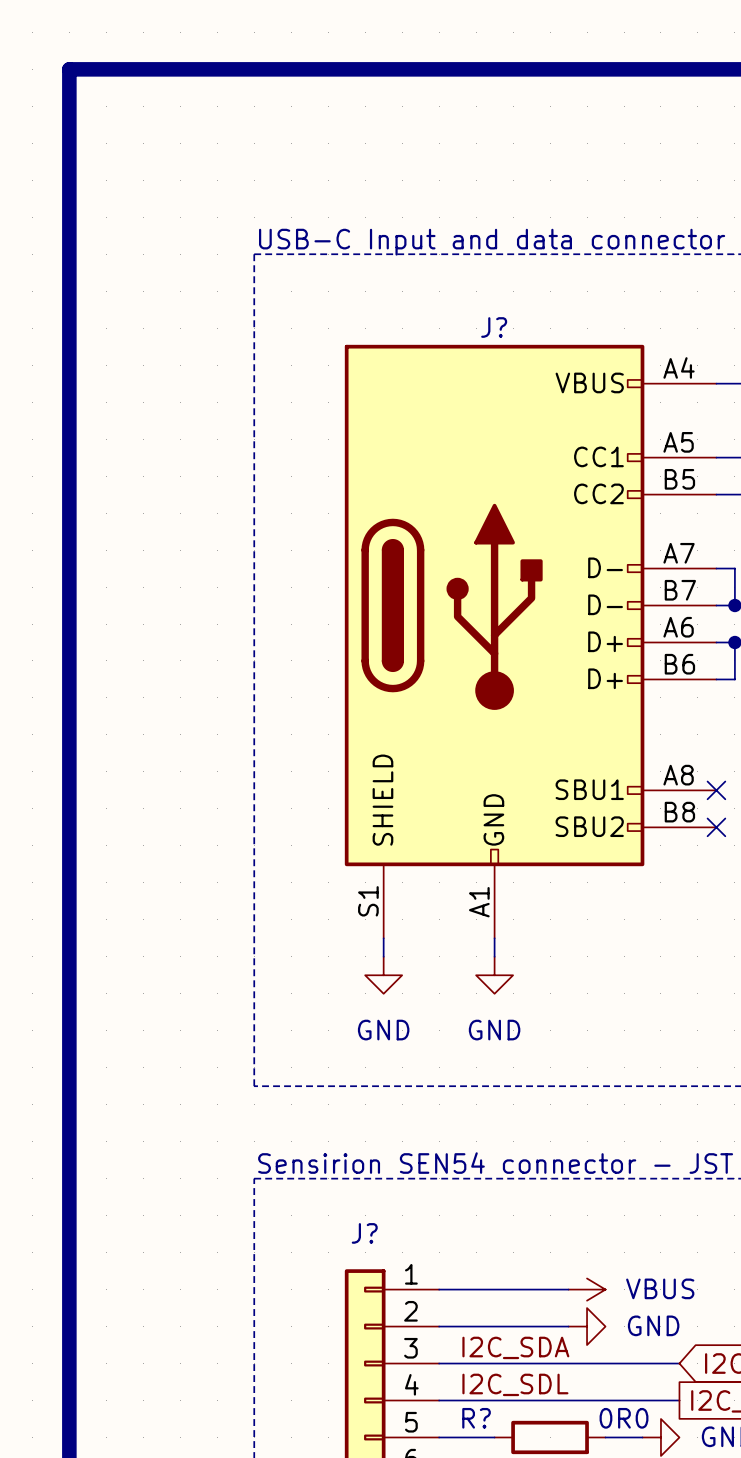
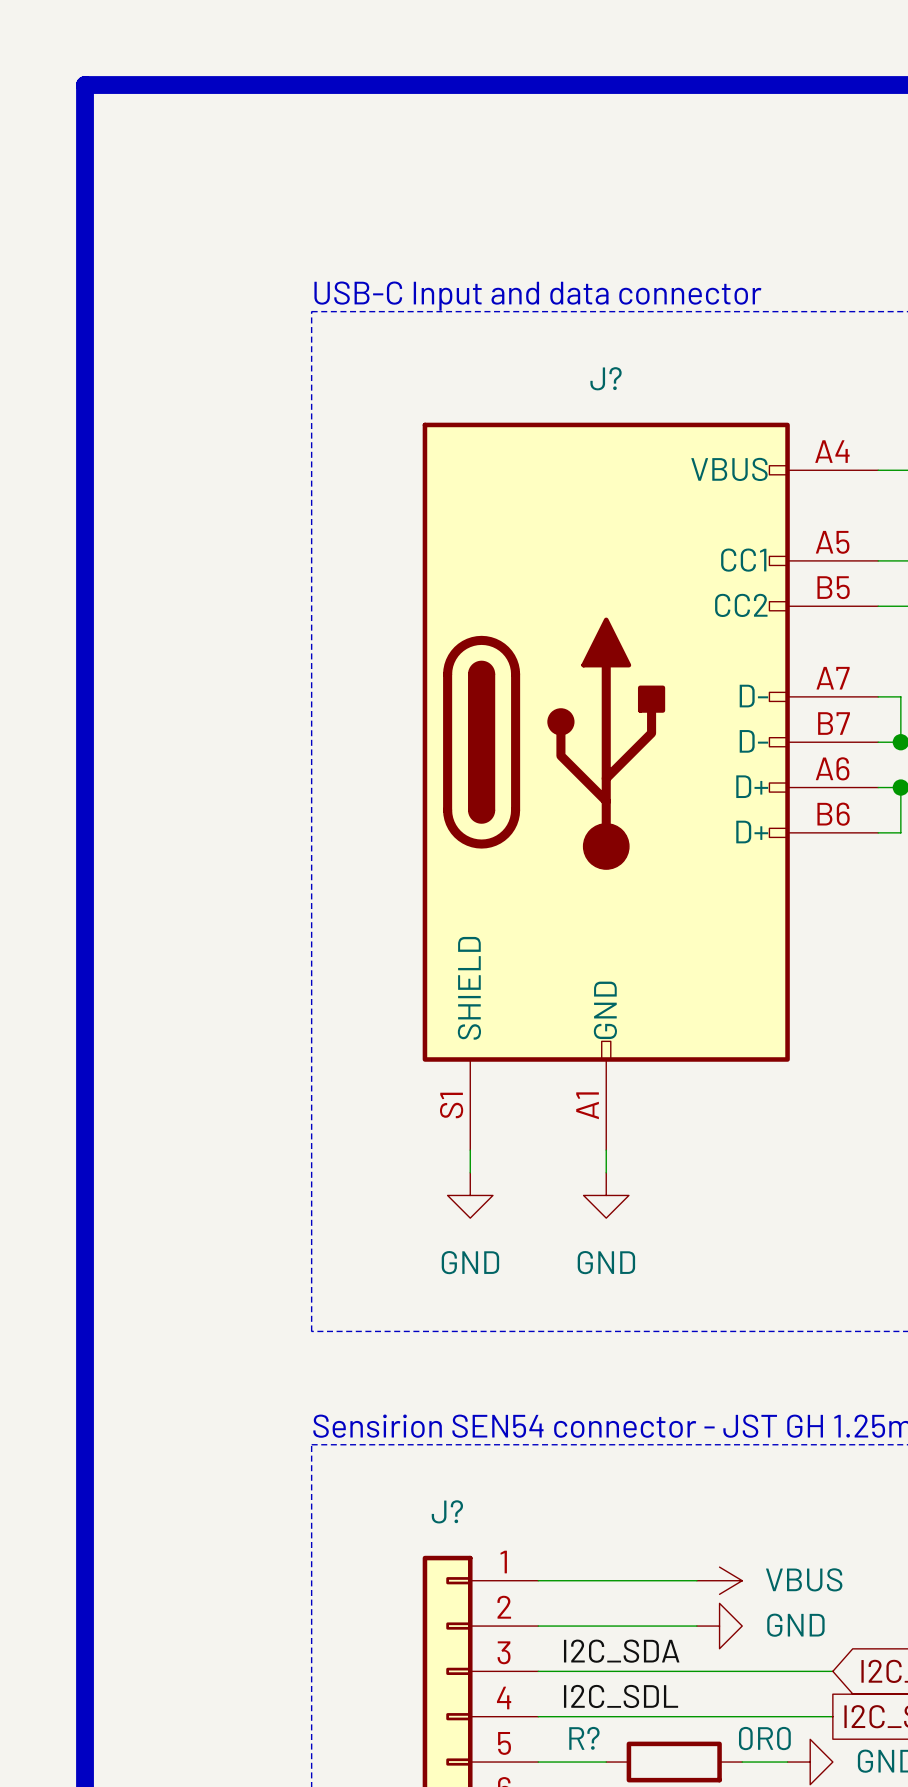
J? symbol: [344, 344, 717, 939] -> [422, 422, 879, 1151]
no-connect mark: (716, 790) -> none
no-connect mark: (716, 827) -> none

